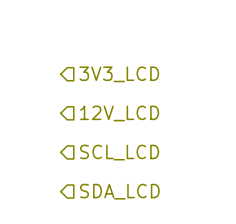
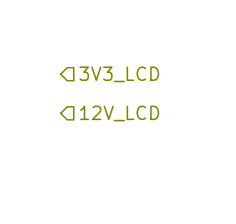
hierarchical label: SCL_LCD (119, 152) -> none
hierarchical label: SDA_LCD (119, 191) -> none

